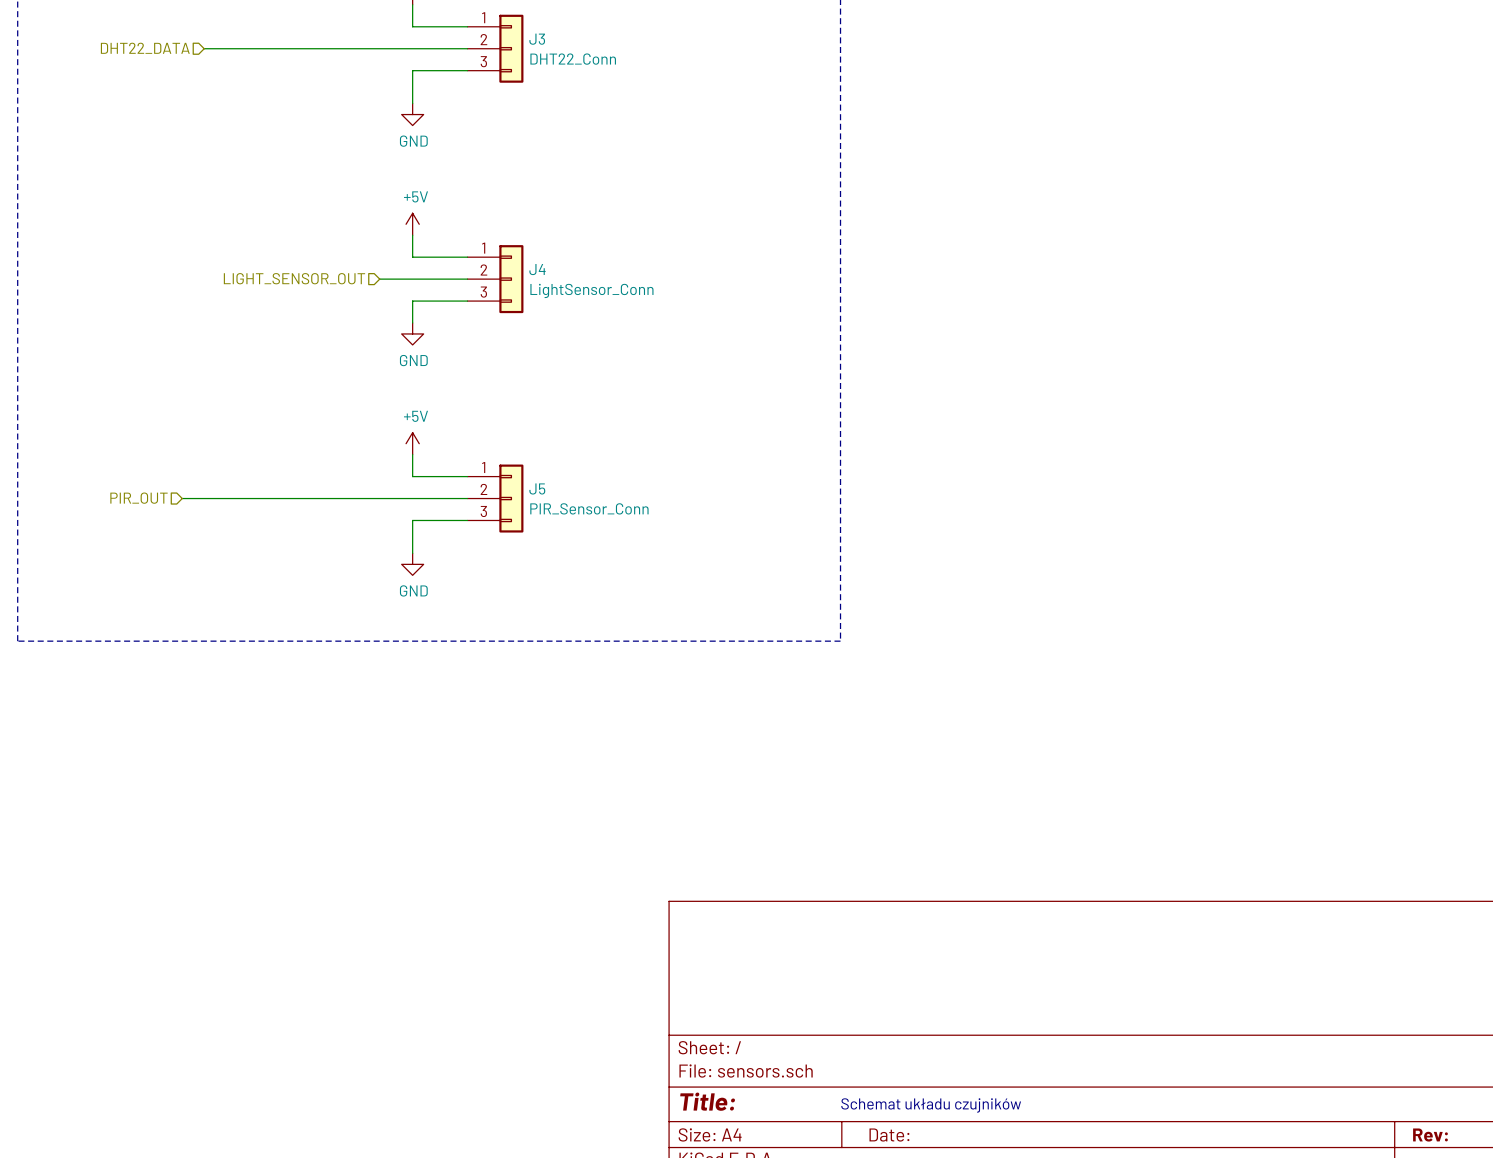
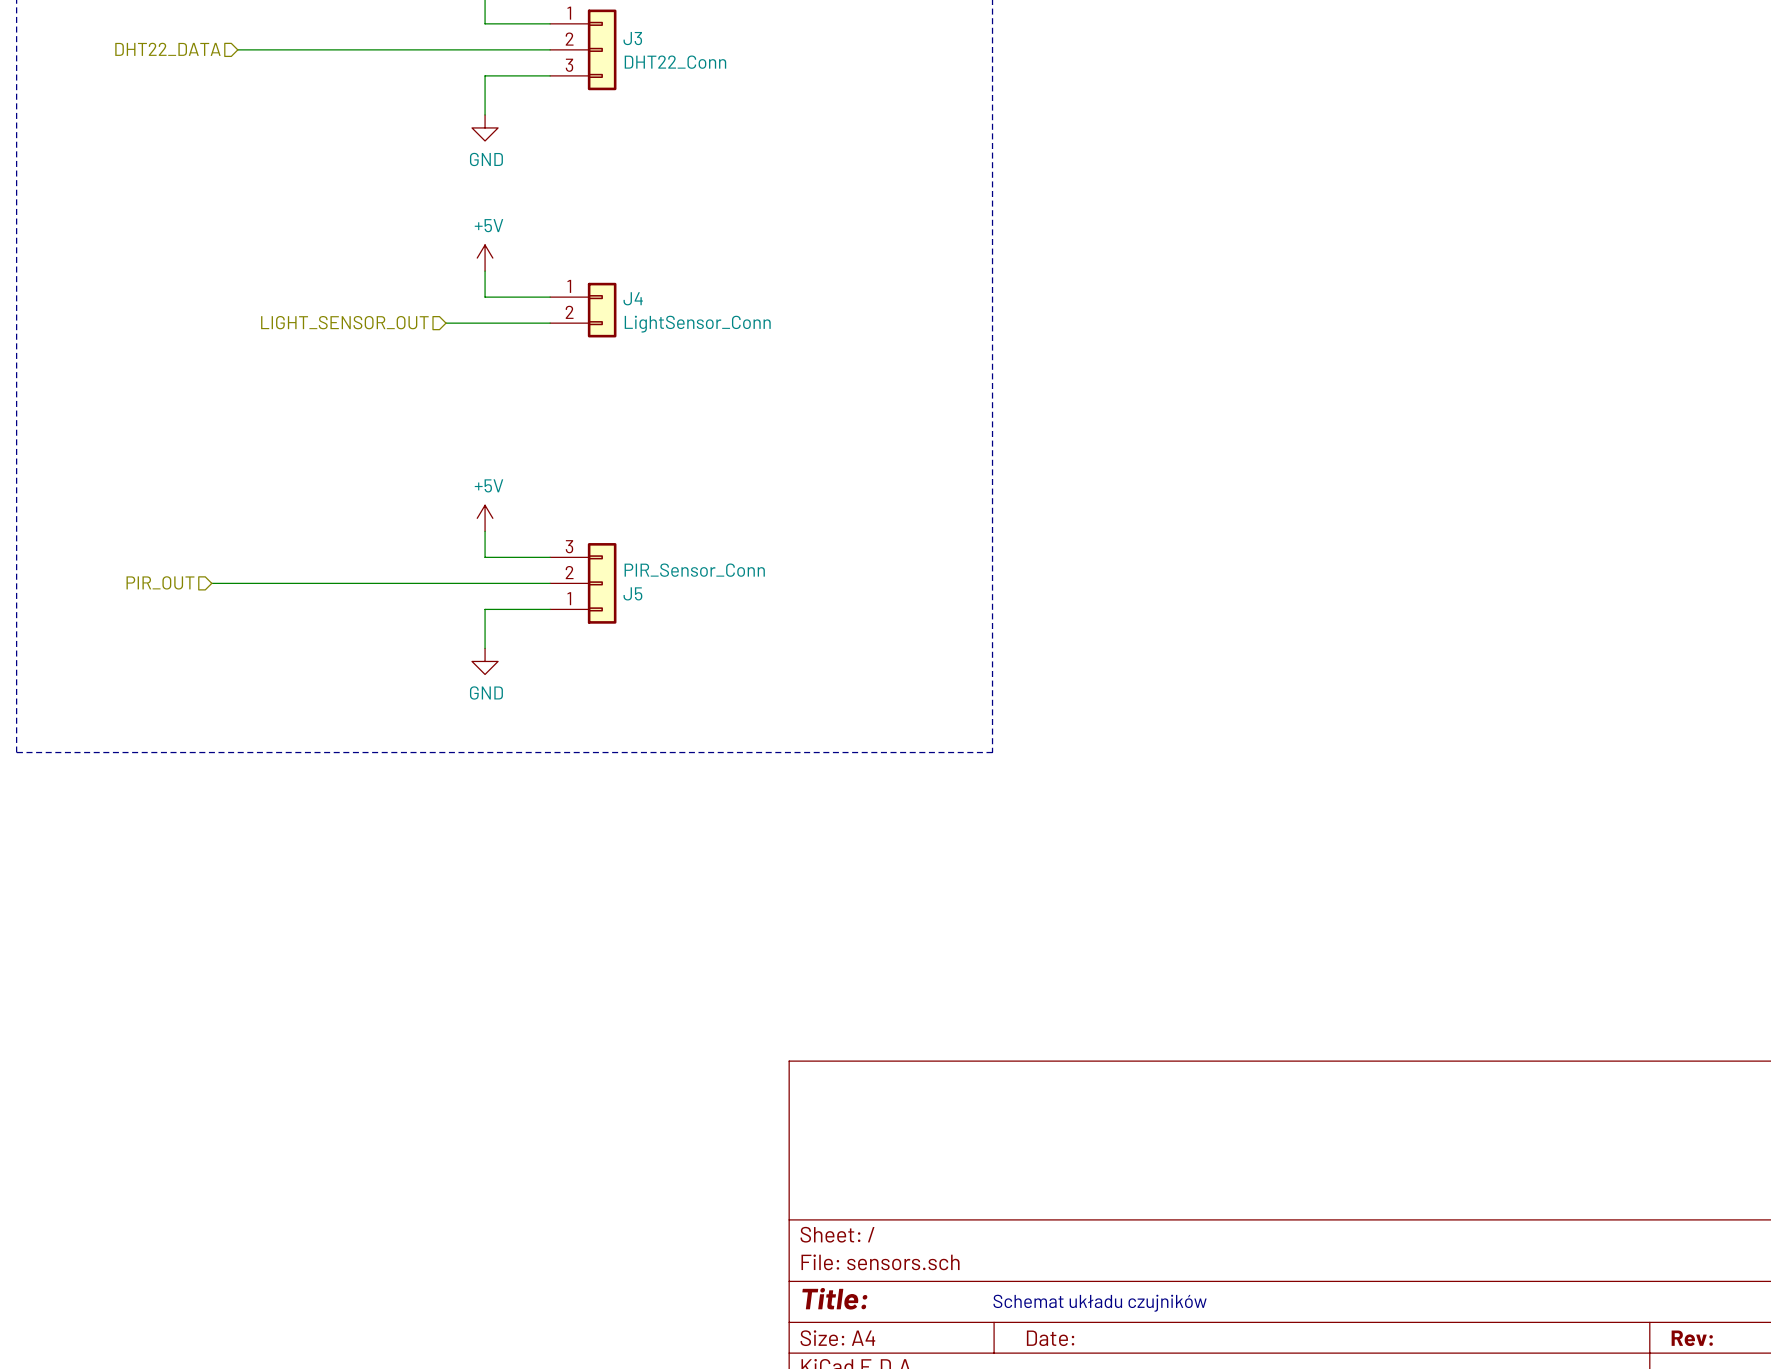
J4 symbol: [467, 245, 524, 314] -> [550, 282, 617, 338]
wire: (467, 301) (412, 301) (412, 323) -> none
power symbol: GND (412, 333) -> none
J5 flip: as is (511, 498) -> up-down (602, 583)

